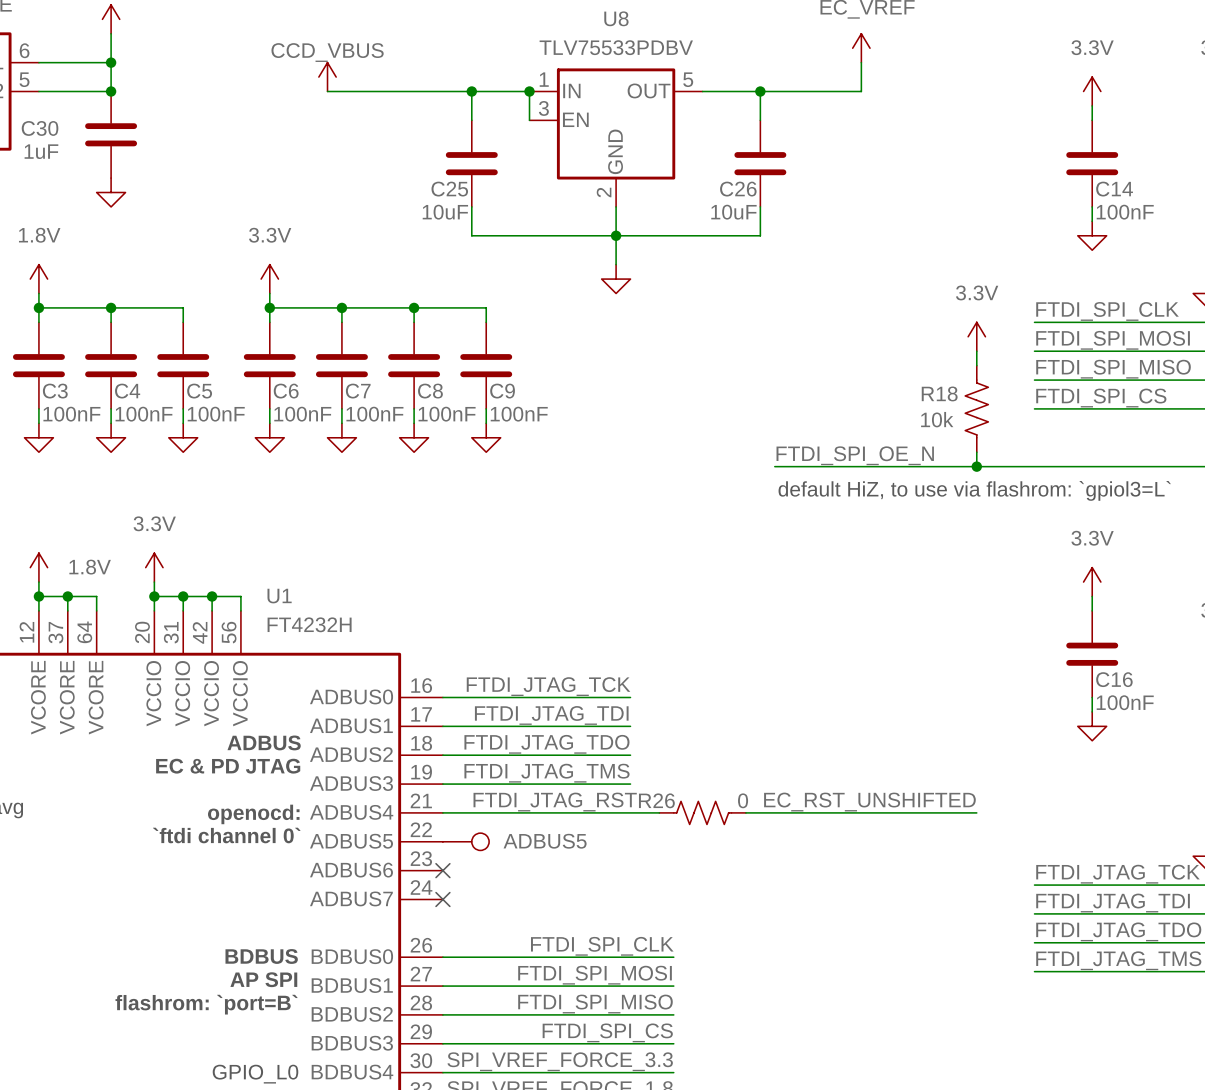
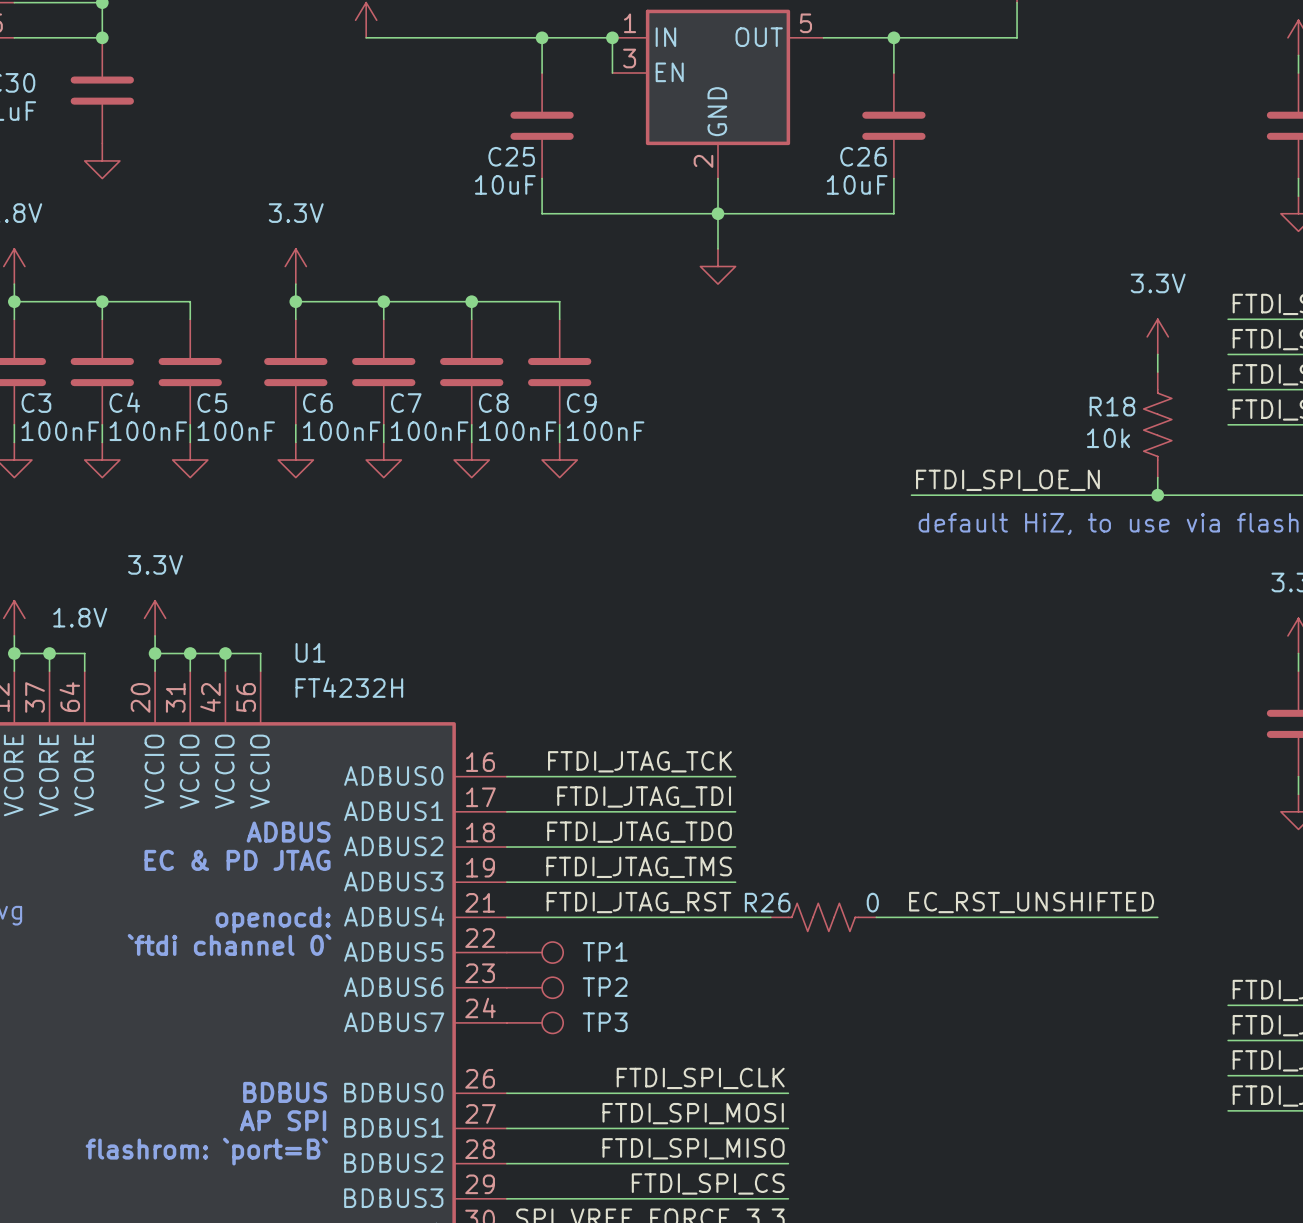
ADBUS5 name: ADBUS5 (545, 841) -> TP1 (605, 951)
no-connect mark: (442, 870) -> none
TP2: none -> (535, 987)
no-connect mark: (442, 899) -> none
TP3: none -> (535, 1022)

